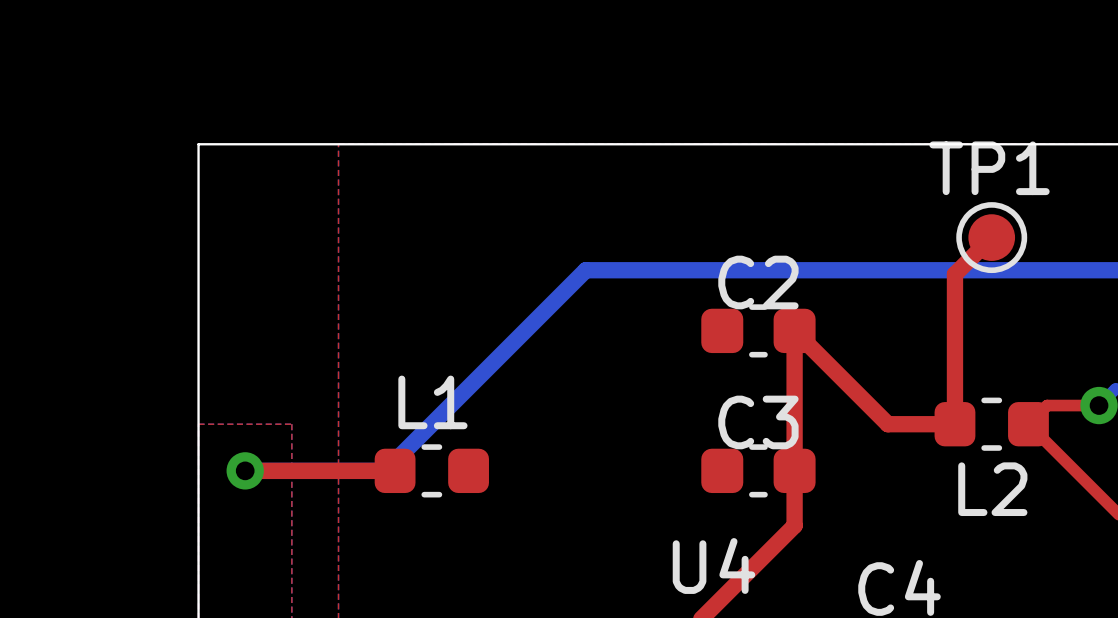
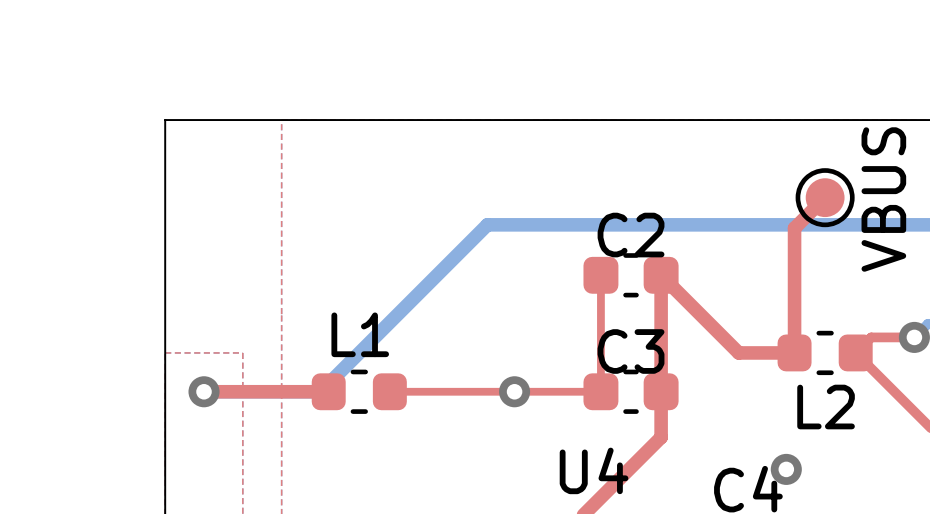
TP1 name: TP1 (989, 168) -> none
TP1 value: none -> VBUS (883, 199)
top track: none -> (600, 275) (600, 391) (389, 391)
via: none -> (514, 391)
via: none -> (786, 469)

